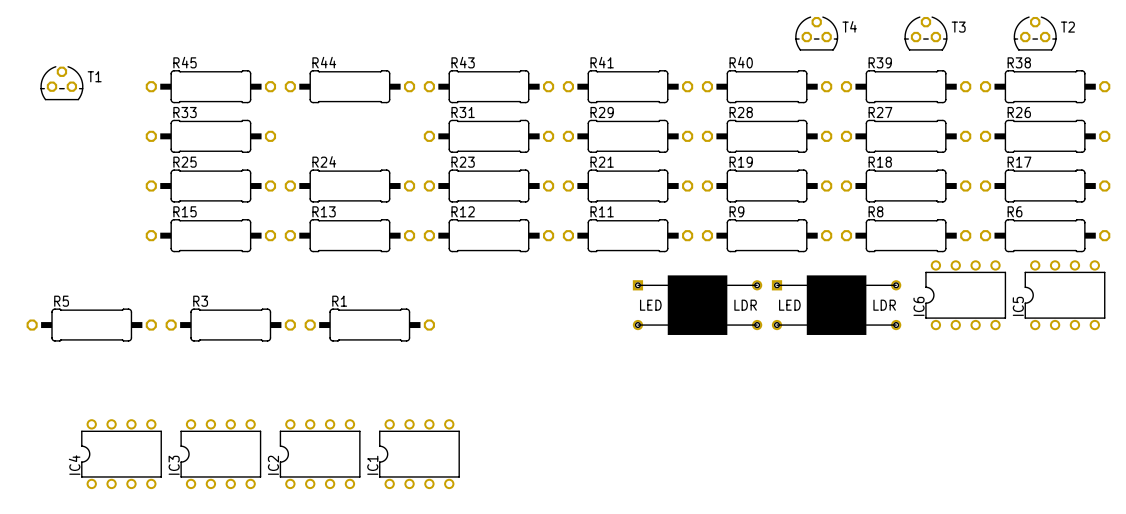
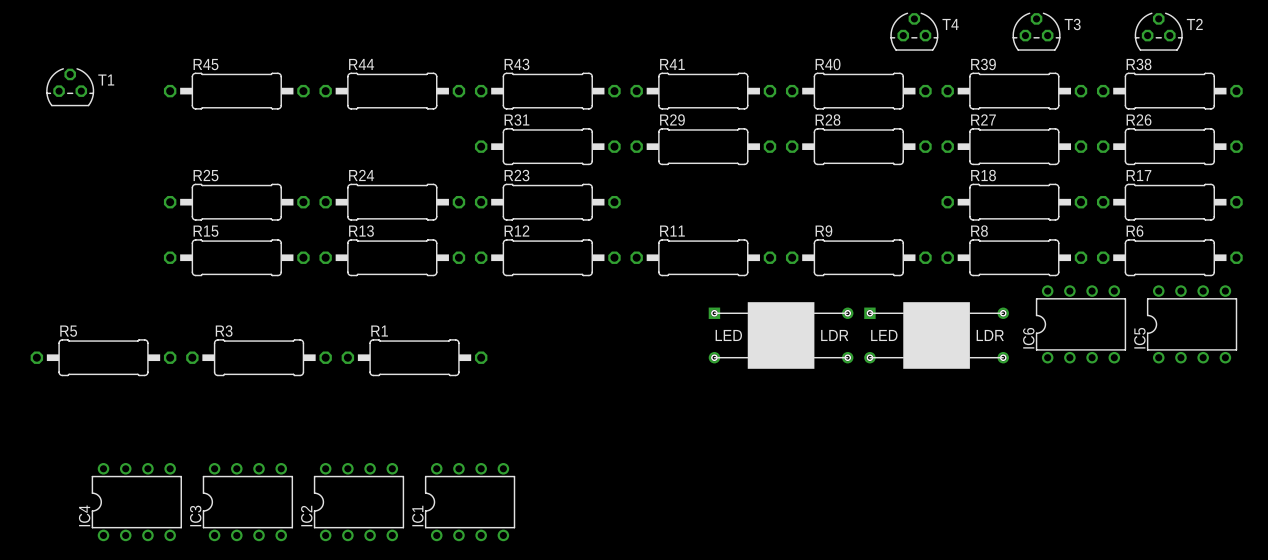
R33: (210, 136) -> none
R21: (628, 186) -> none
R19: (767, 186) -> none

